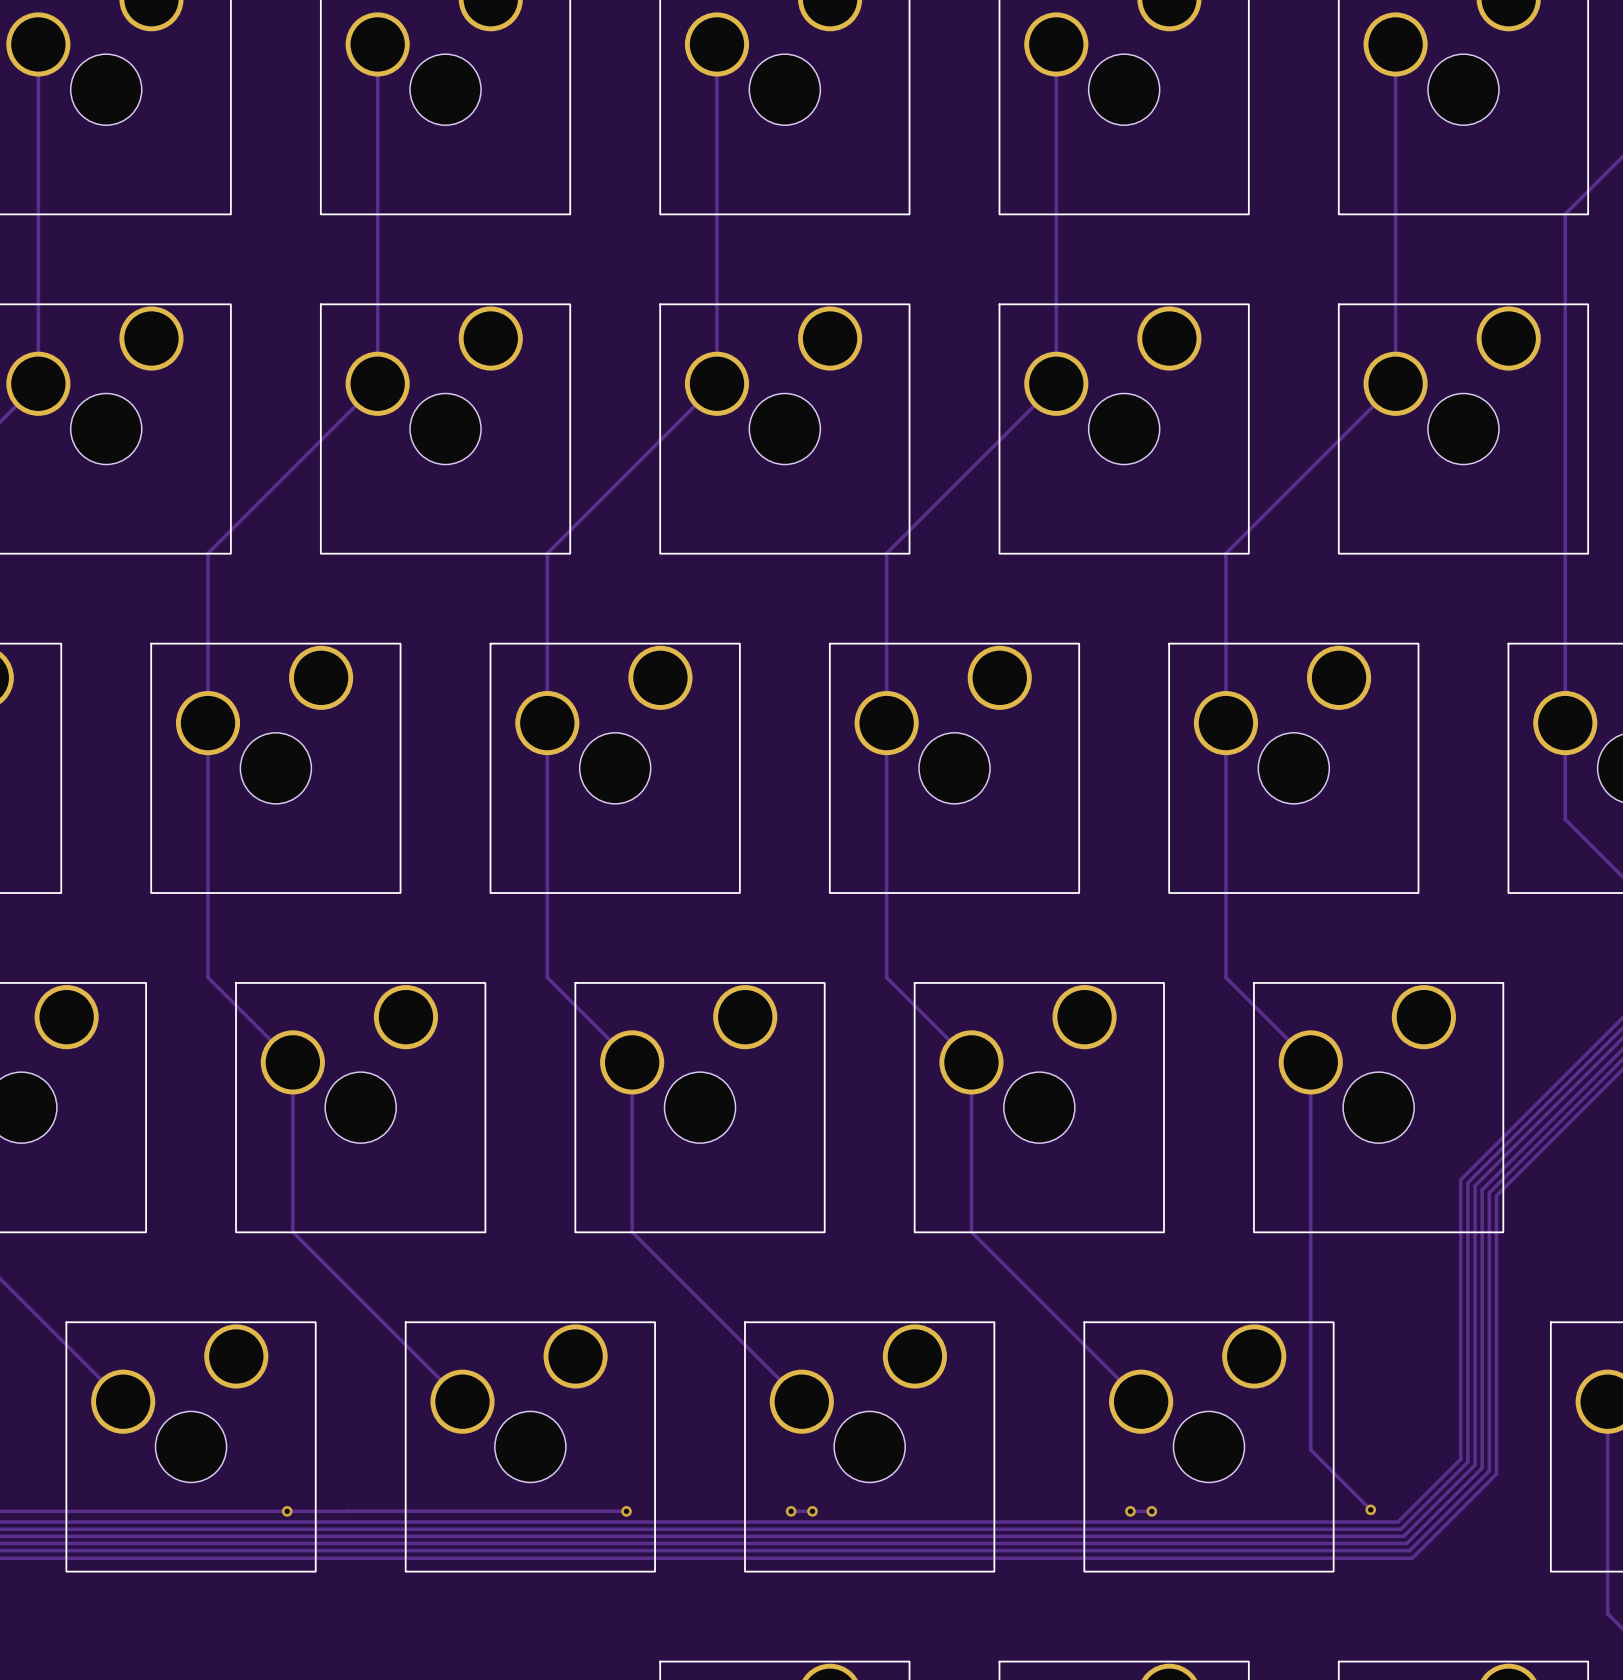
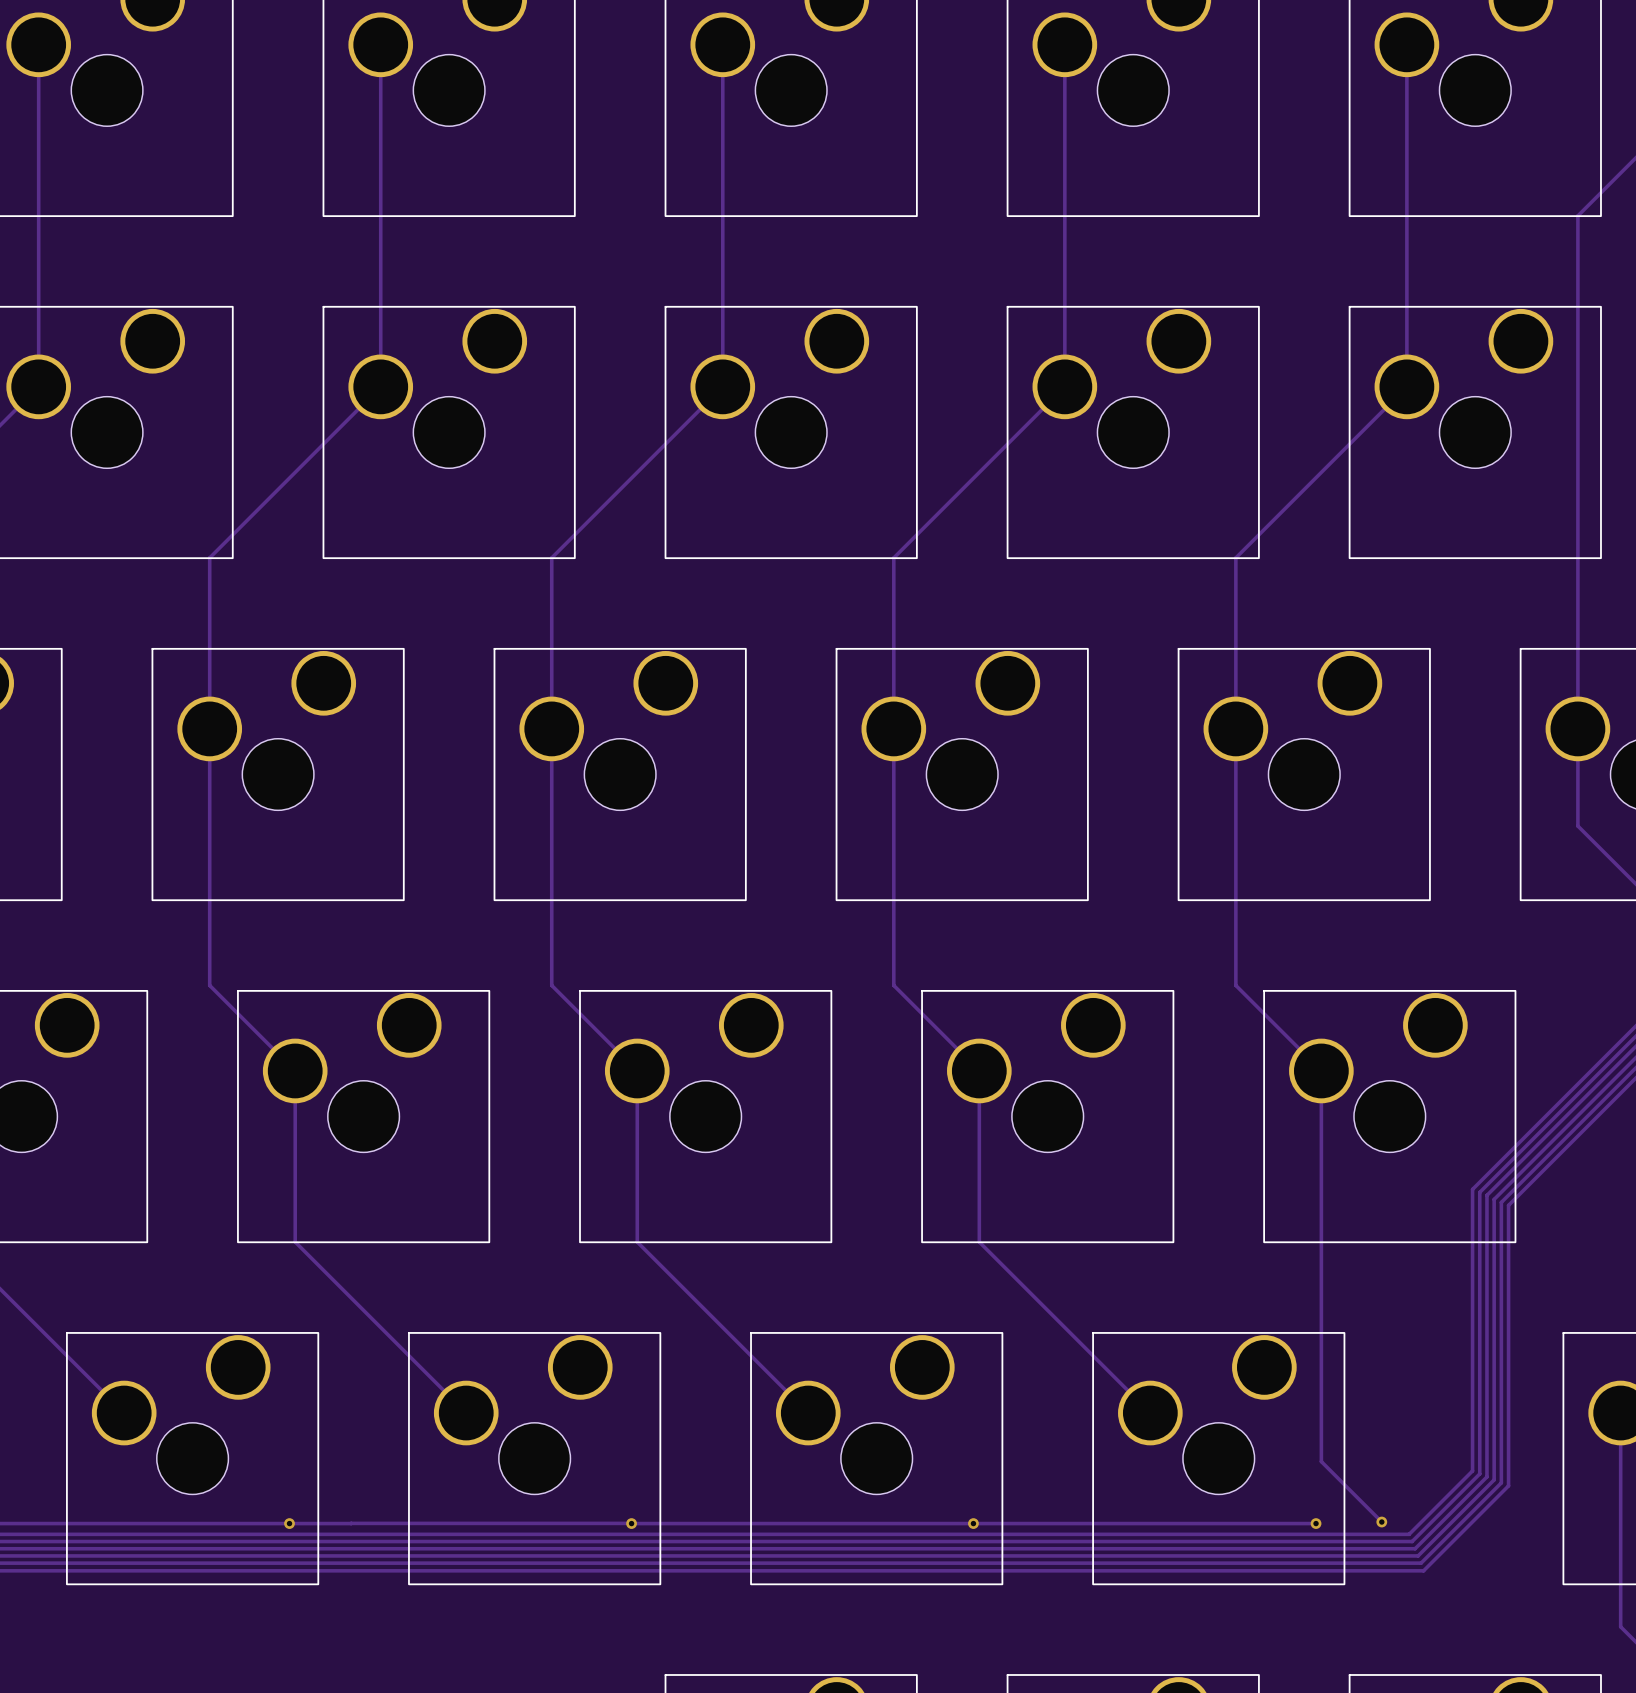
track: none -> (631, 1523) (797, 1523)
via: (791, 1511) -> none
track: none -> (819, 1523) (1139, 1523)
via: (812, 1511) -> none
via: none -> (973, 1523)
via: (1130, 1511) -> none
track: none -> (1161, 1523) (1316, 1523)
via: (1151, 1511) -> none
via: none -> (1316, 1523)

